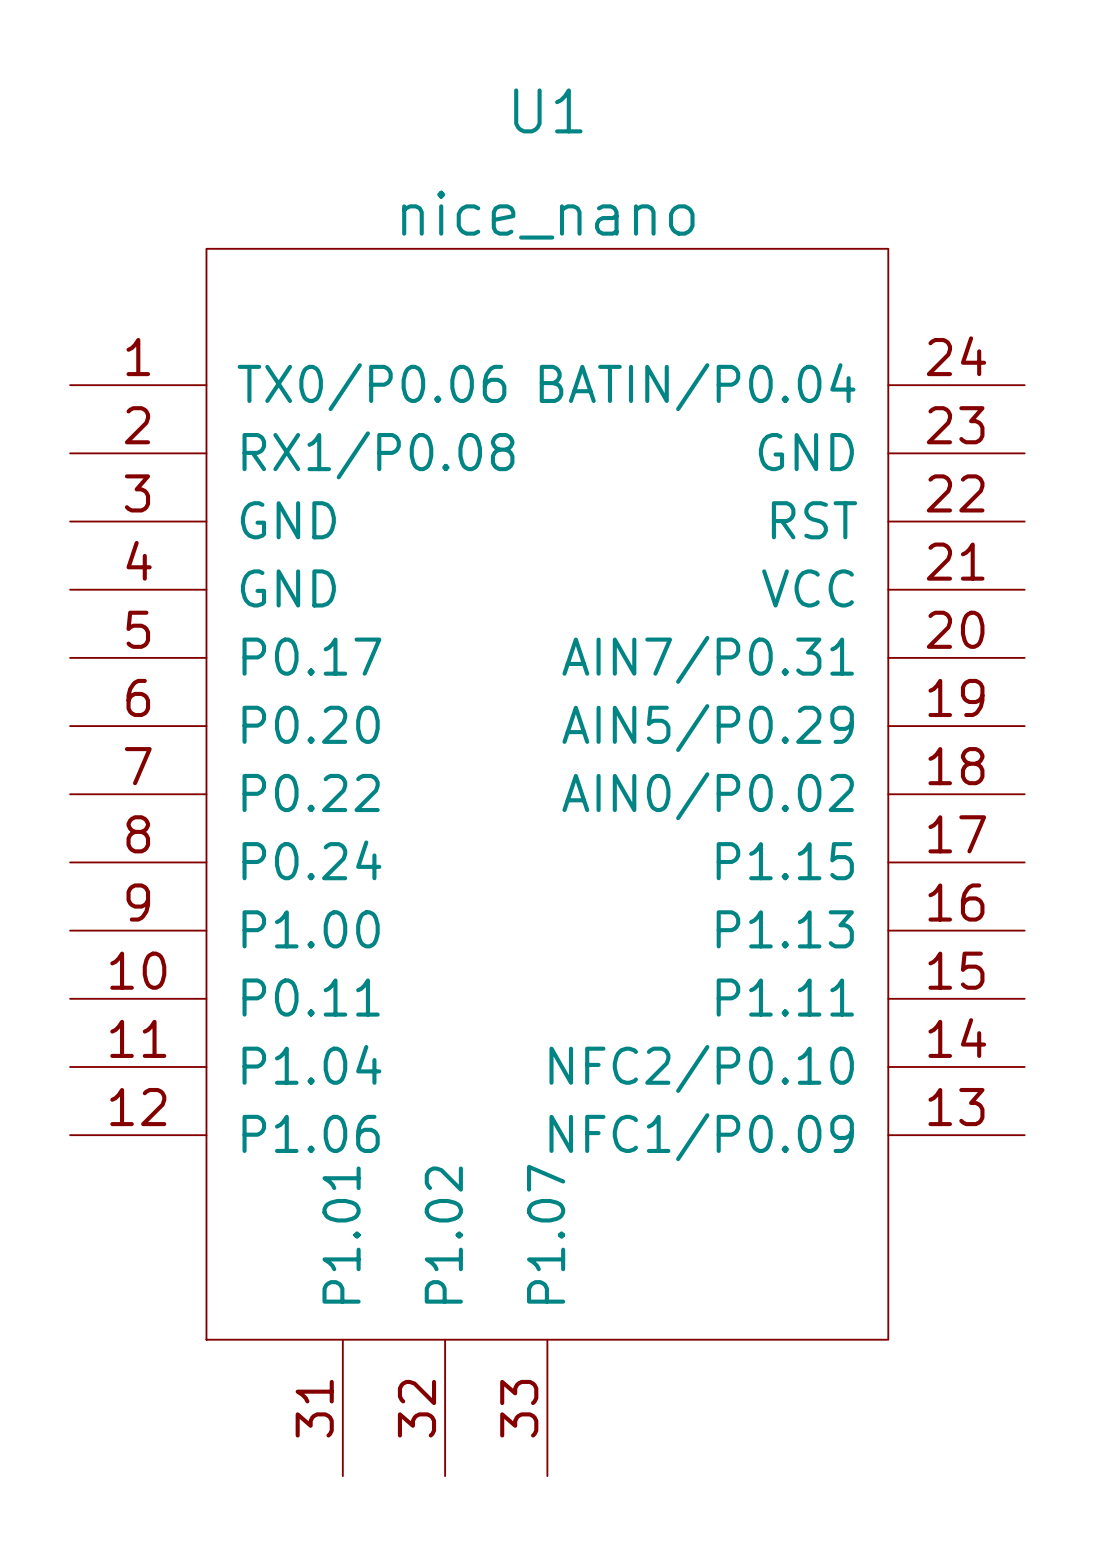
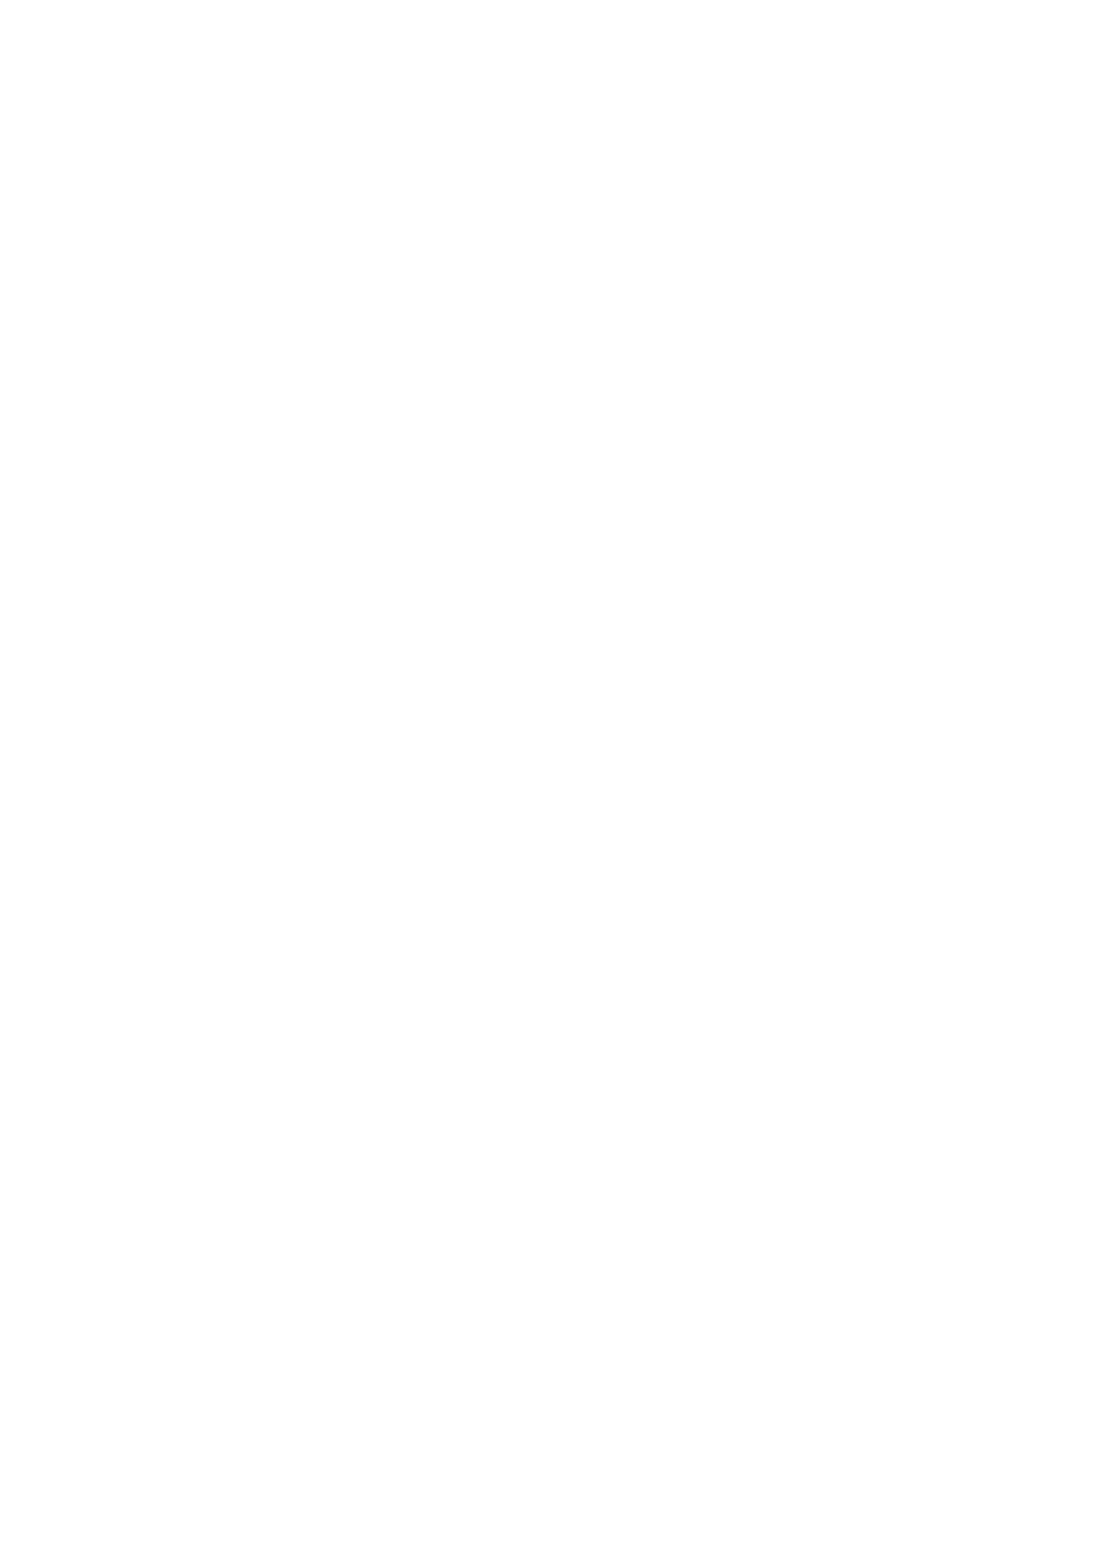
U1: nice_nano (547, 862) -> none

